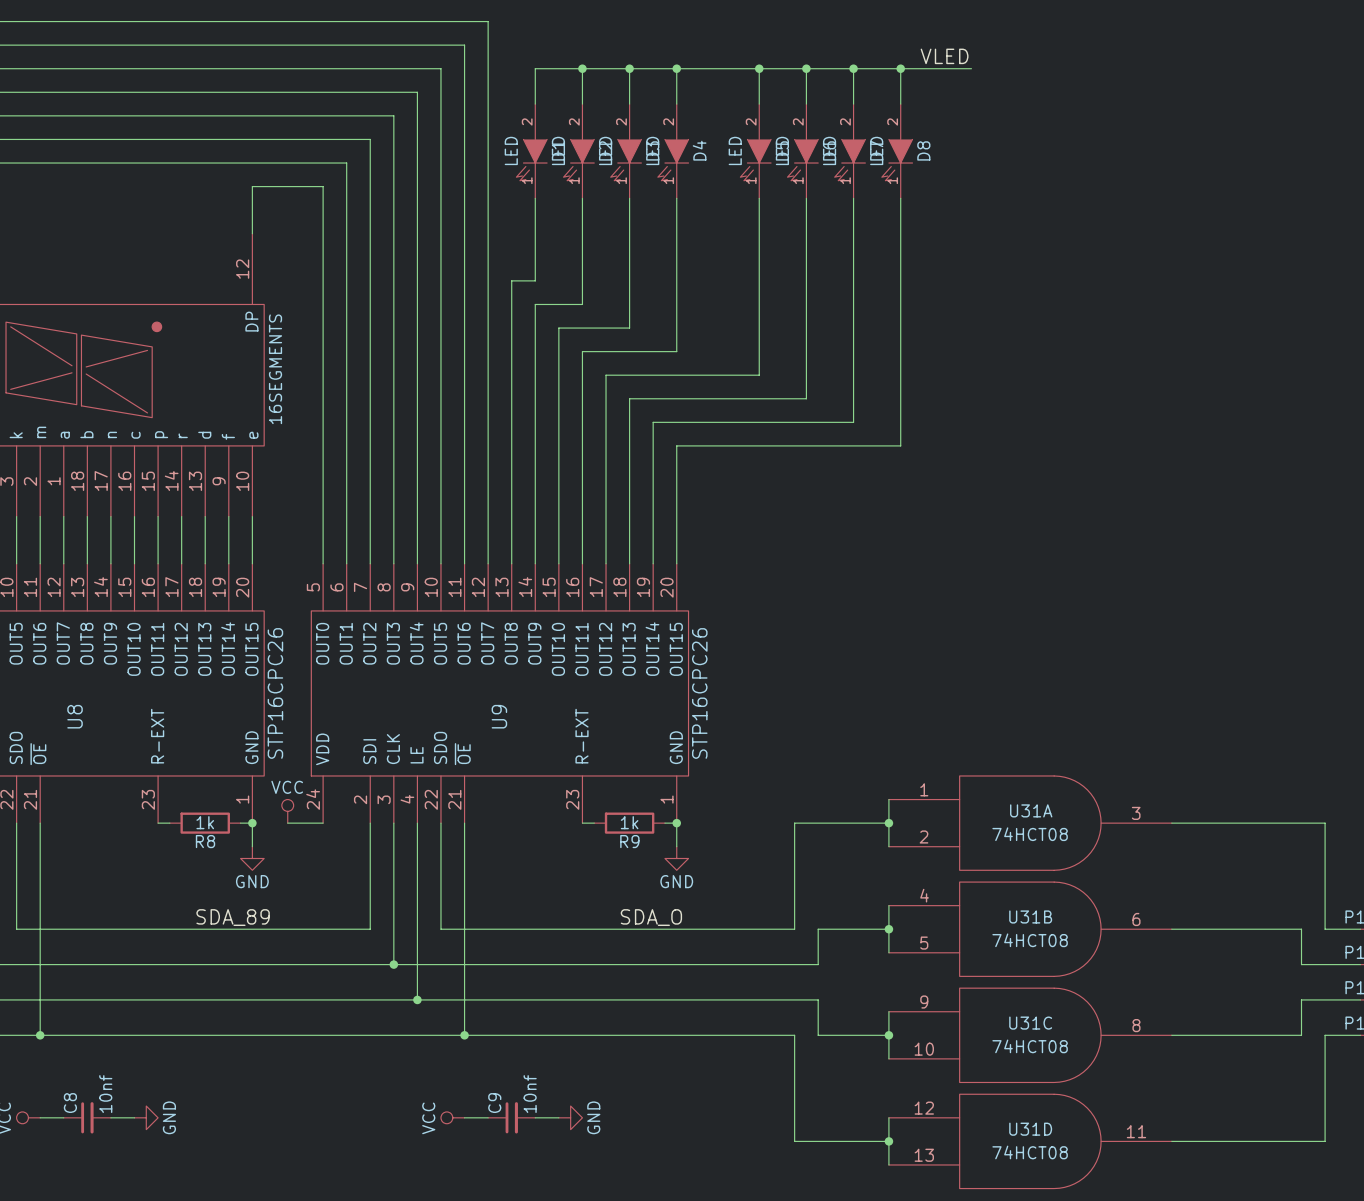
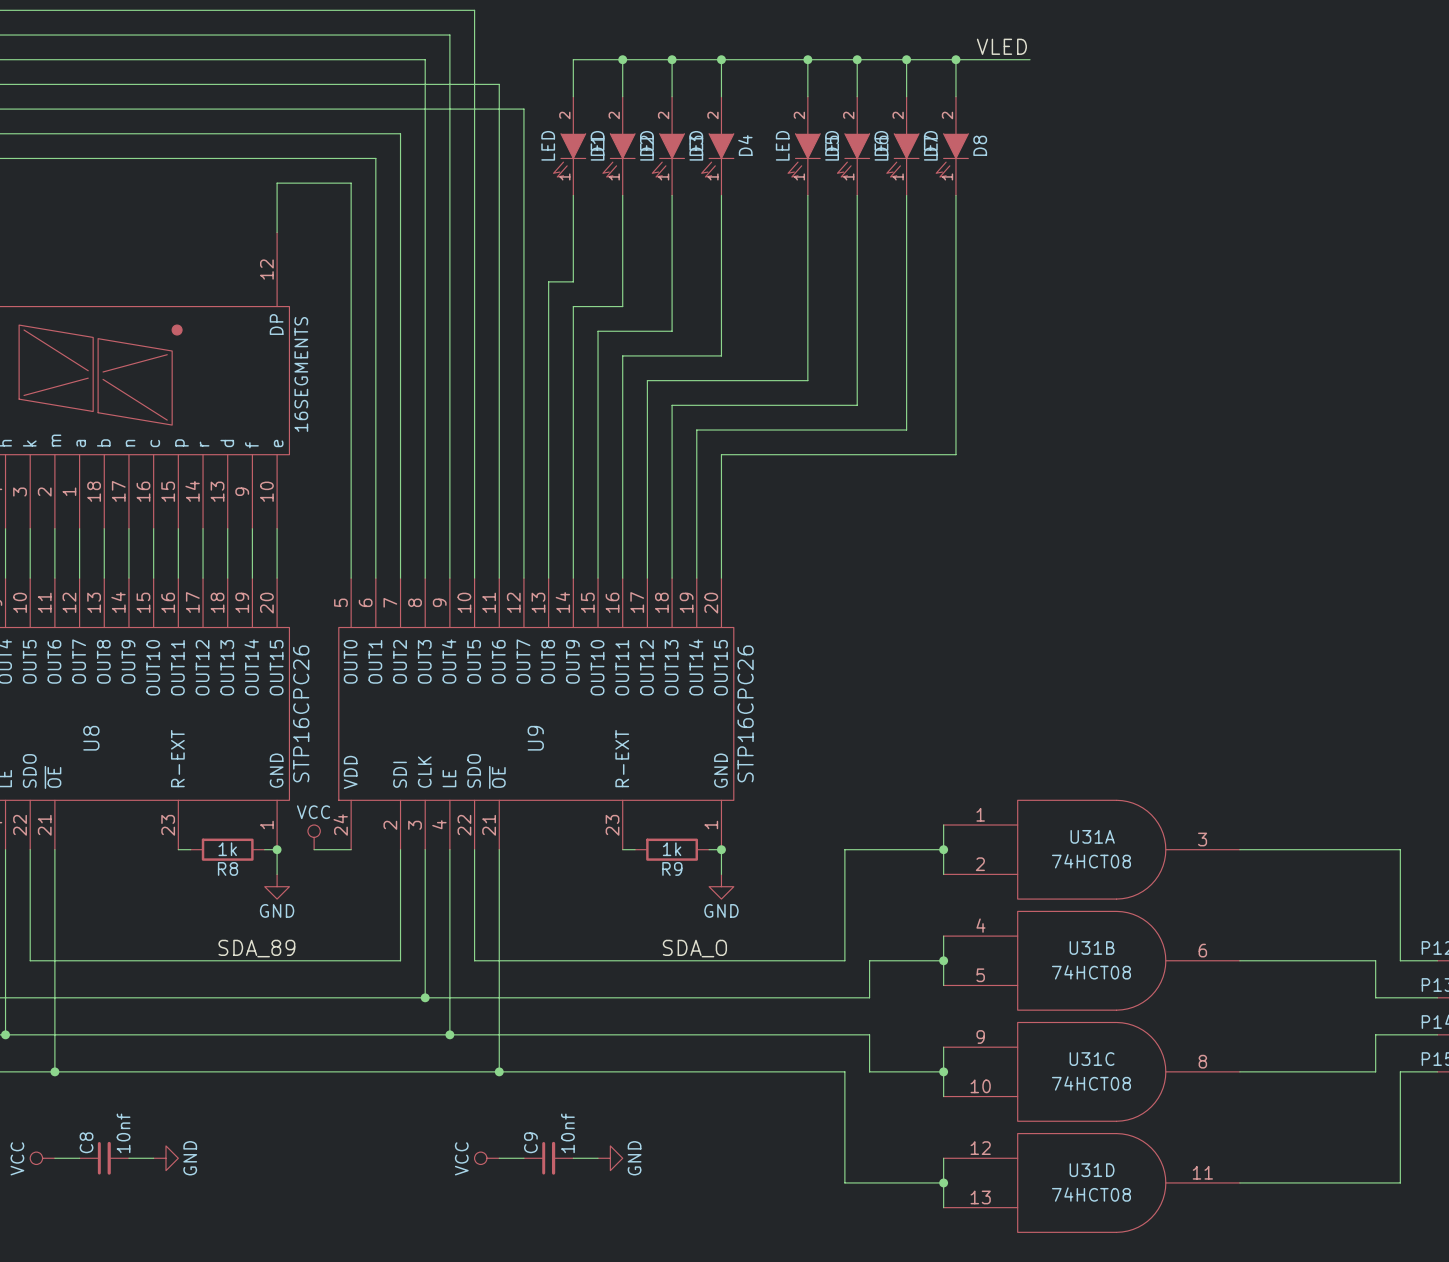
wire: (440, 21) (488, 21) (488, 115) -> (425, 59) (425, 109) (523, 109)
wire: (417, 45) (464, 45) (464, 92) -> (449, 35) (449, 84) (499, 84)
wire: (393, 68) (440, 68) -> (474, 10) (474, 59)

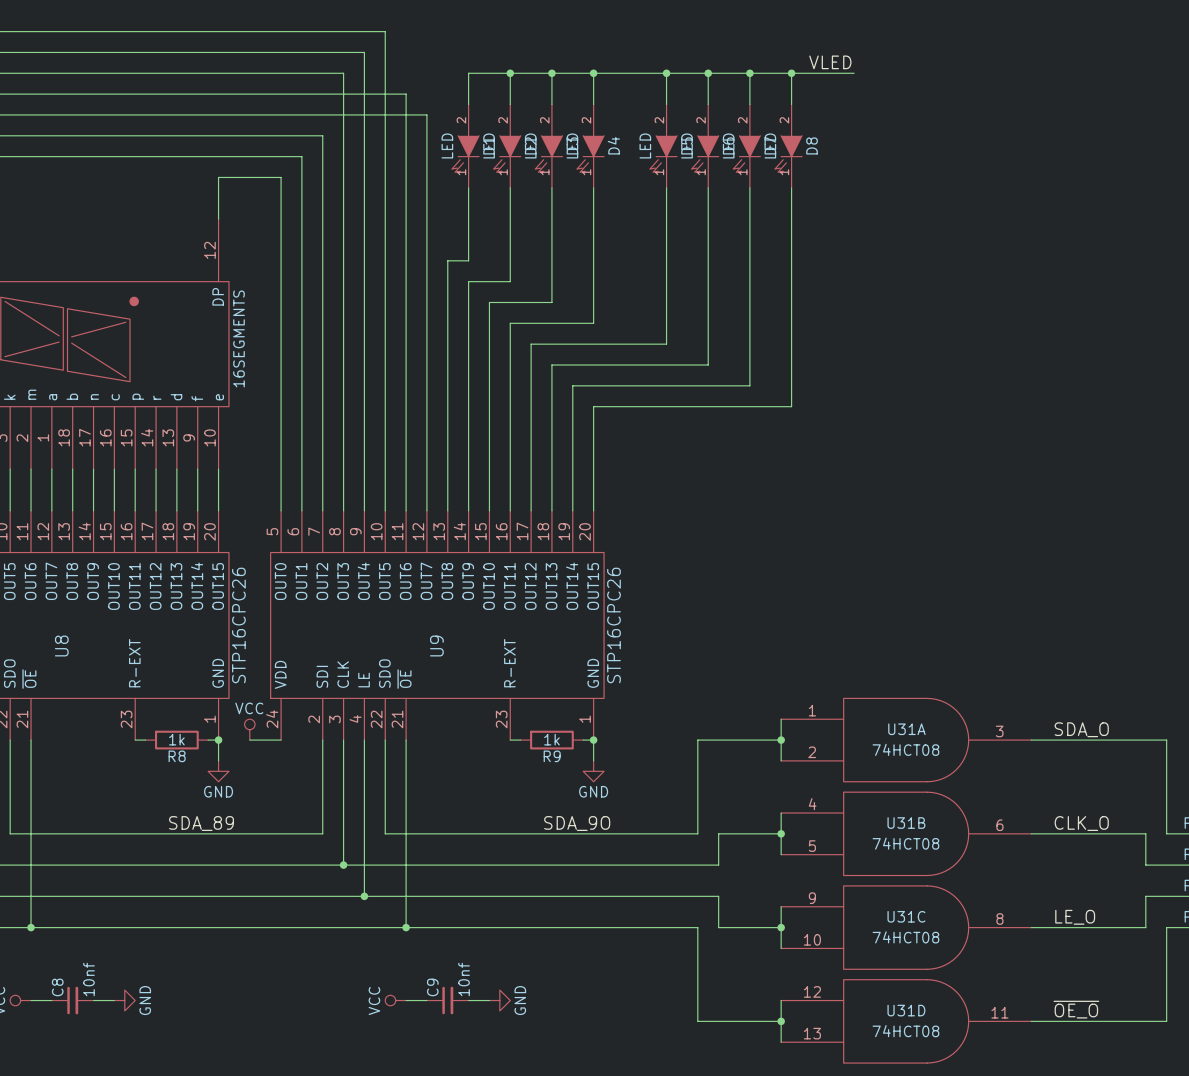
label: none -> SDA_O (1081, 729)
label: SDA_O (694, 948) -> SDA_9O (577, 823)
label: none -> CLK_O (1081, 823)
label: none -> LE_O (1075, 917)
label: none -> ~{OE_O} (1076, 1009)

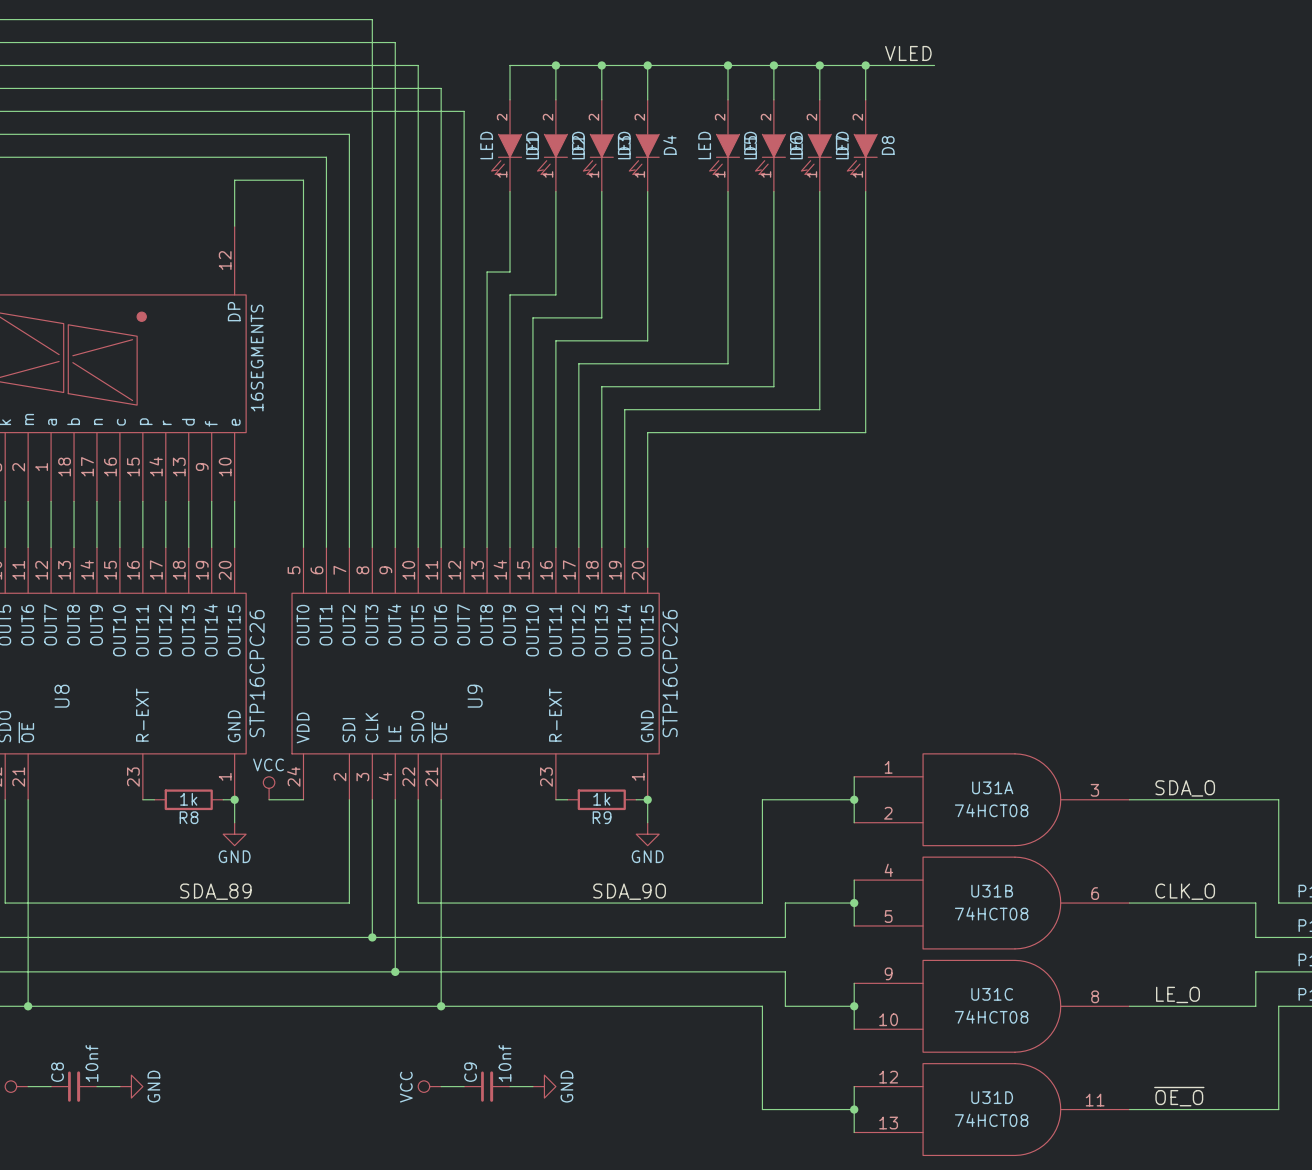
wire: (343, 31) (385, 31) (385, 73) -> (372, 19) (372, 65) (418, 65)

